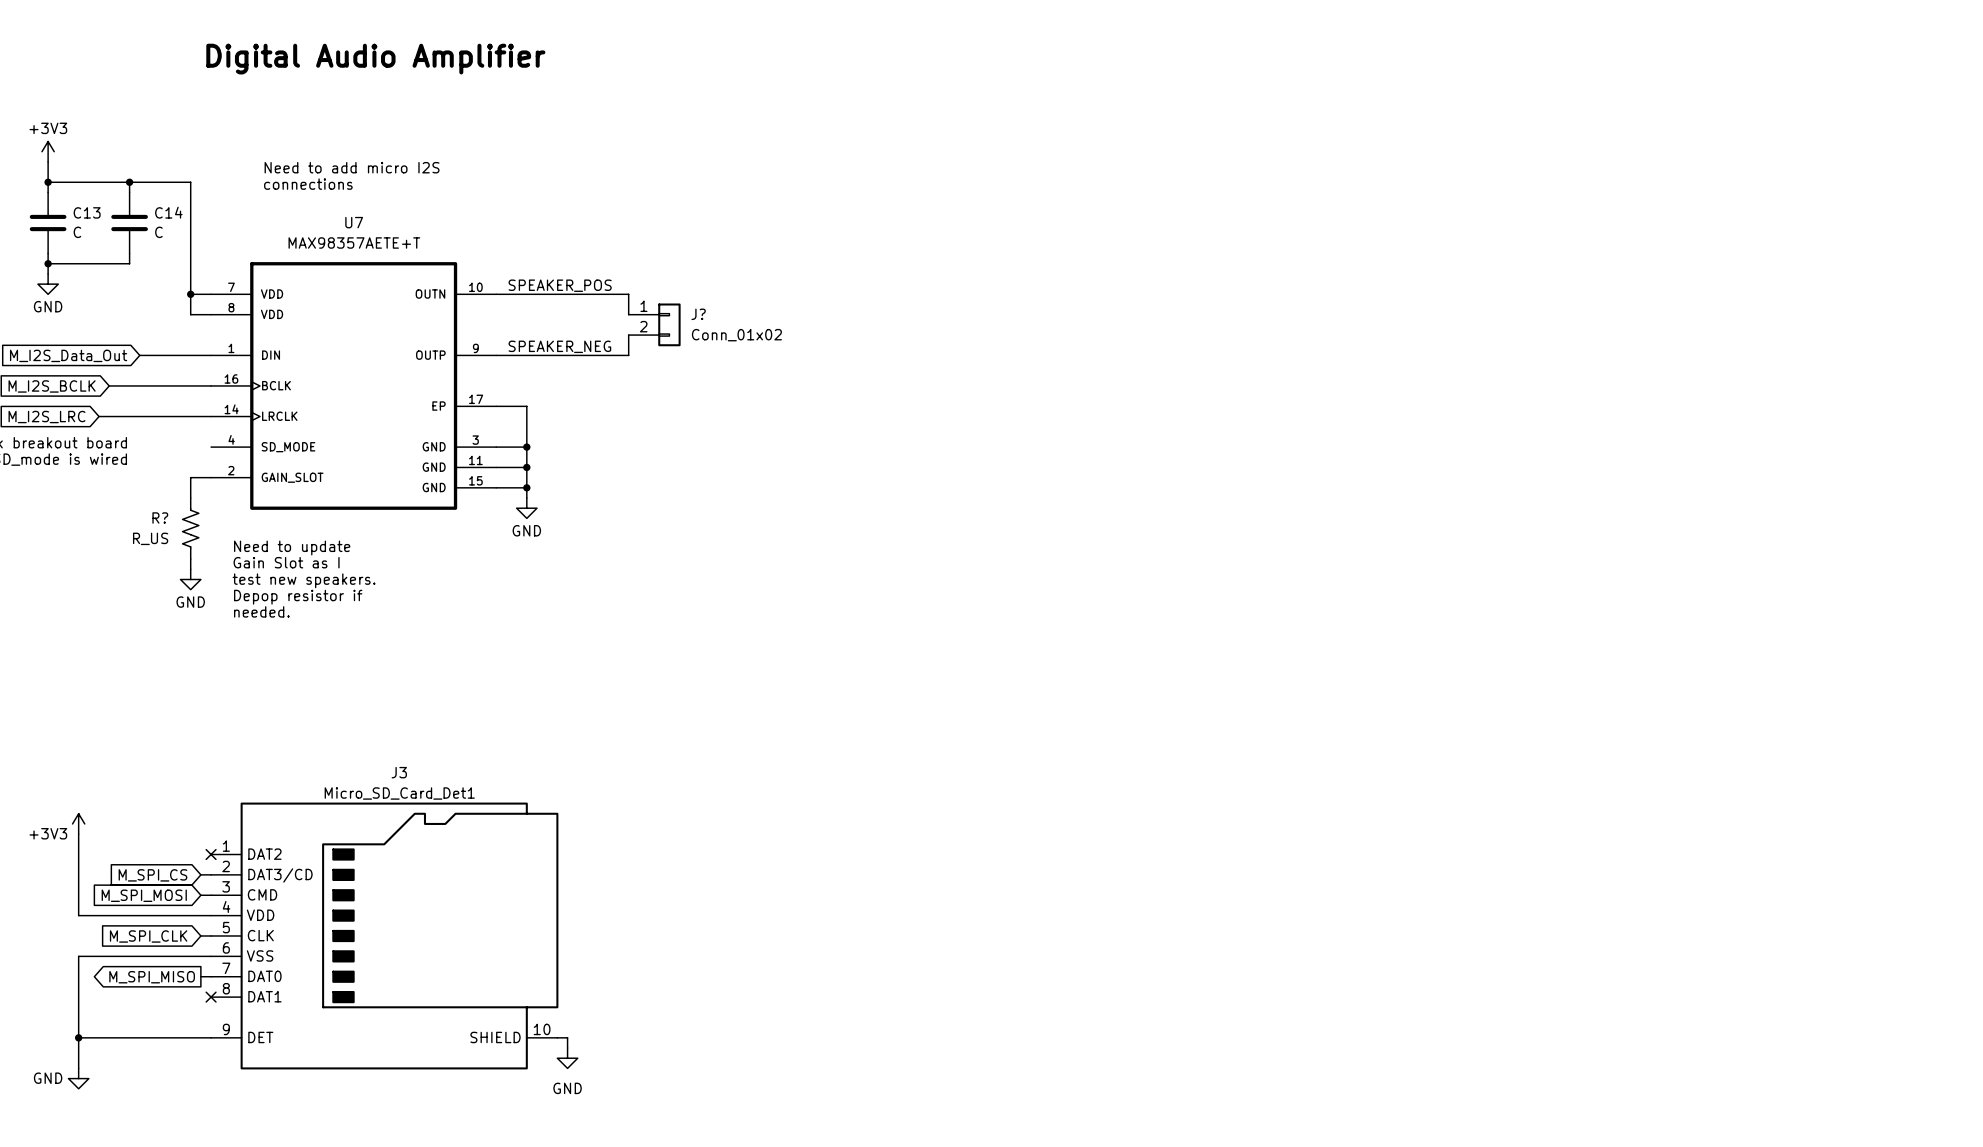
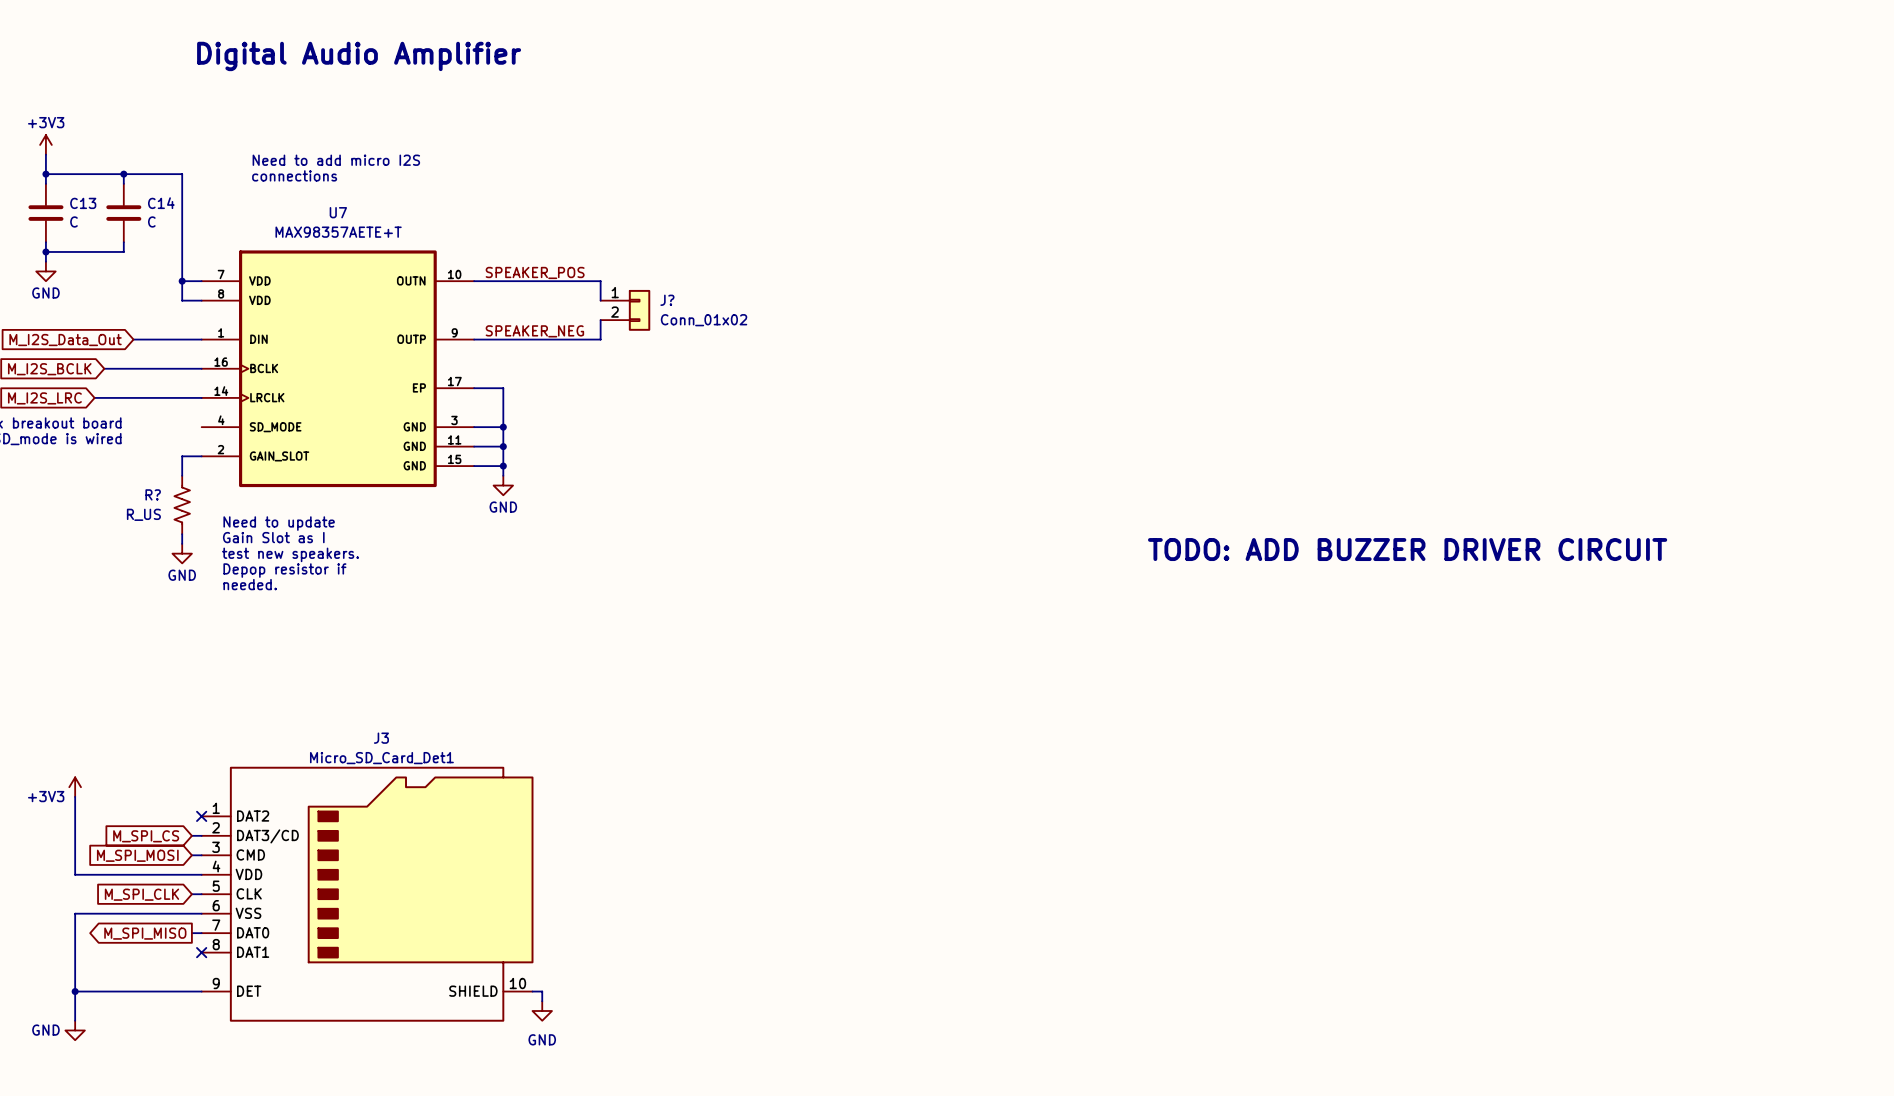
text: none -> TODO: ADD BUZZER DRIVER CIRCUIT (1407, 549)

